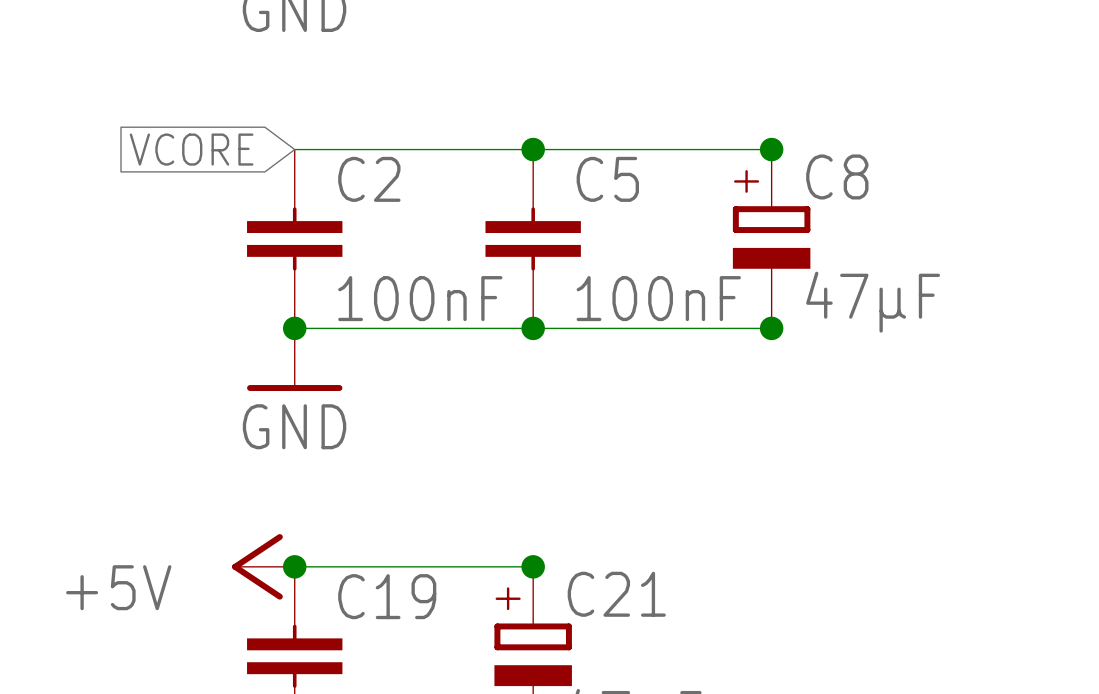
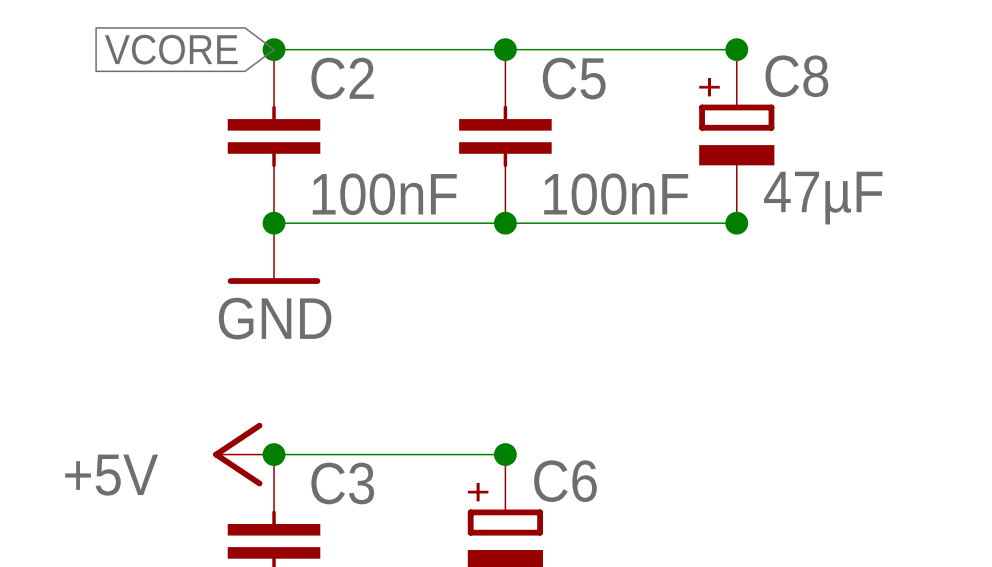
junction: none -> (274, 49)
C21 name: C21 (616, 594) -> C6 (565, 481)
C19 name: C19 (387, 596) -> C3 (342, 483)

